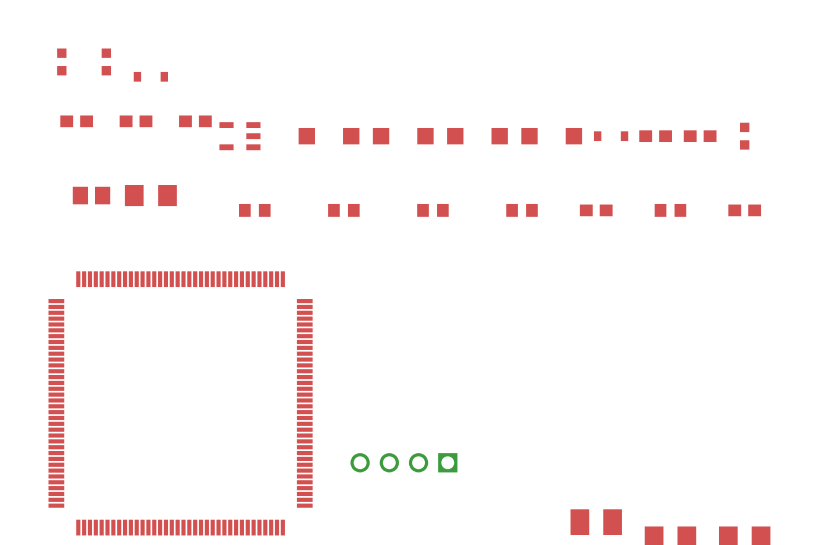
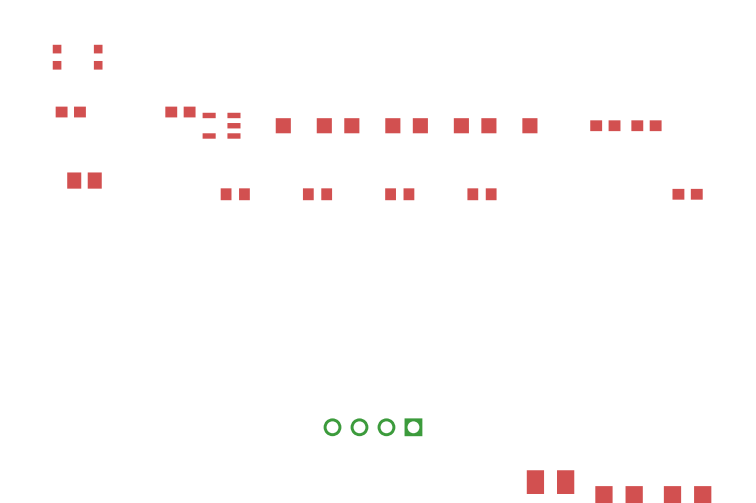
part: (150, 76) -> none
part: (136, 121) -> none
part: (611, 136) -> none
part: (744, 136) -> none
part: (150, 195) -> none
part: (596, 210) -> none
part: (670, 210) -> none
part: (180, 403) -> none

